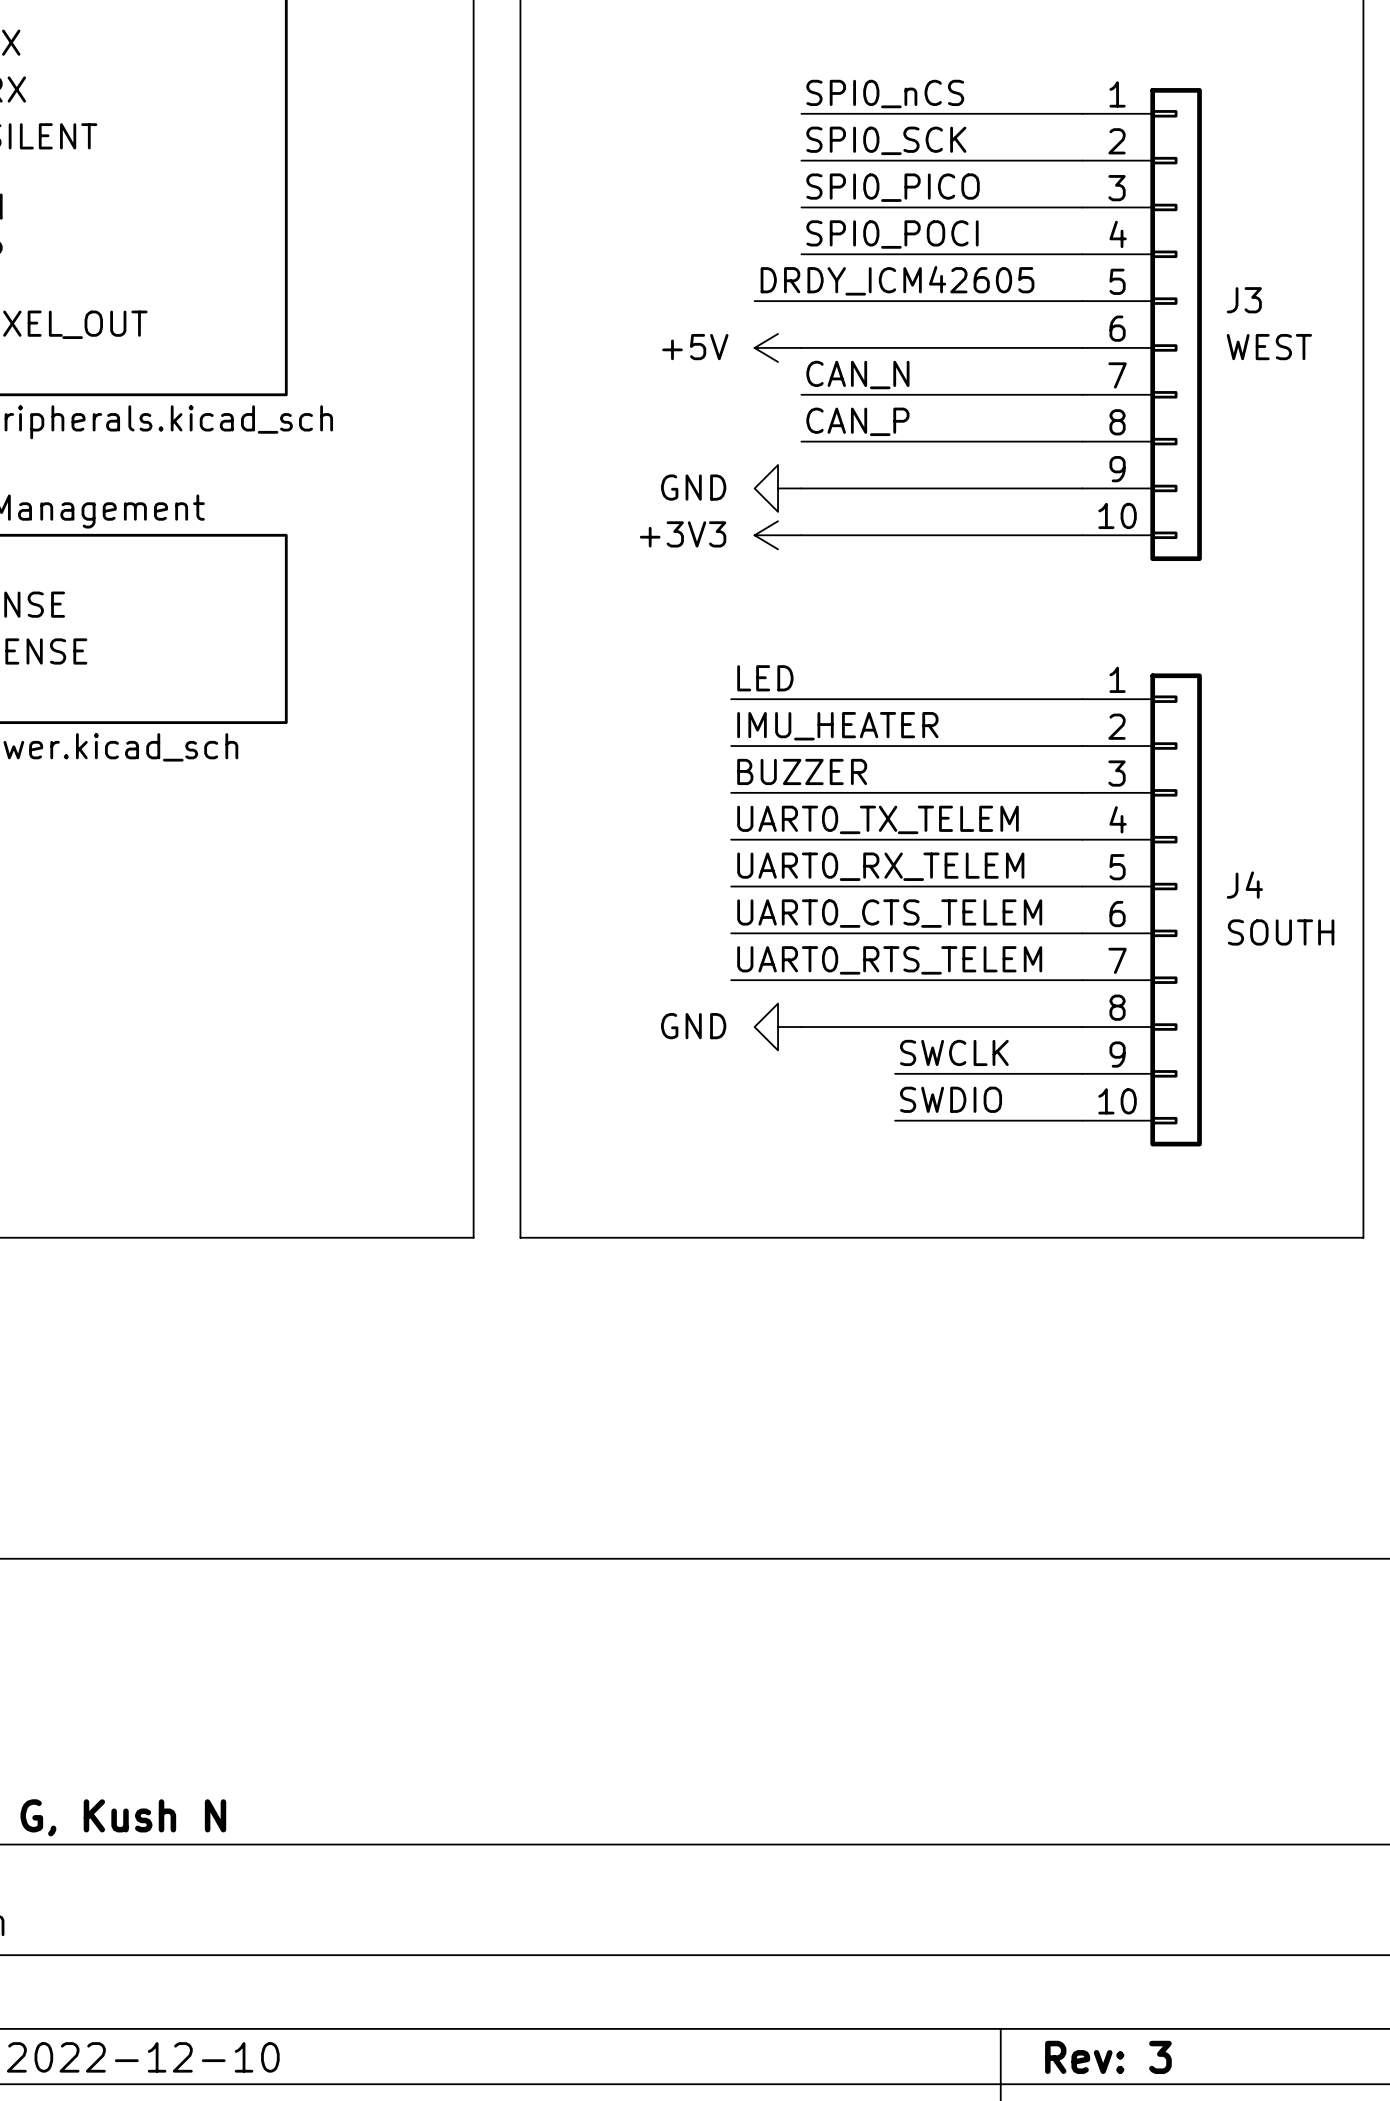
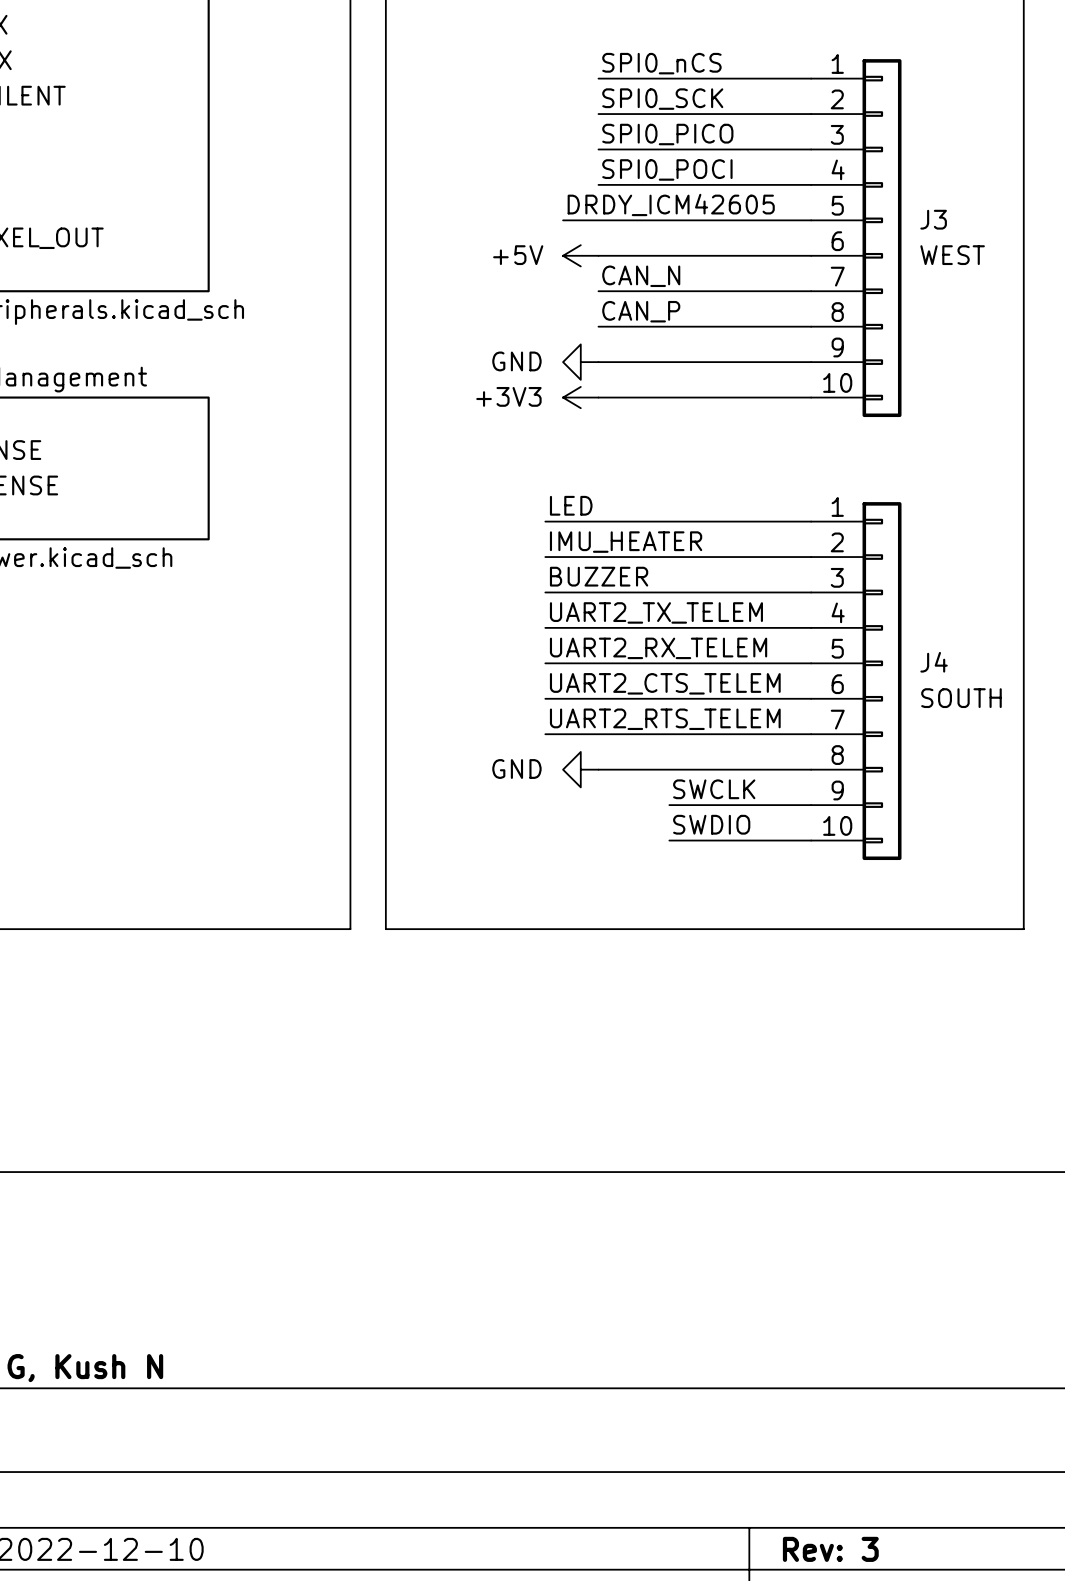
label: UART0_TX_TELEM (878, 819) -> UART2_TX_TELEM (656, 612)
label: UART0_RX_TELEM (880, 866) -> UART2_RX_TELEM (658, 648)
label: UART0_CTS_TELEM (889, 913) -> UART2_CTS_TELEM (665, 683)
label: UART0_RTS_TELEM (889, 960) -> UART2_RTS_TELEM (665, 719)

